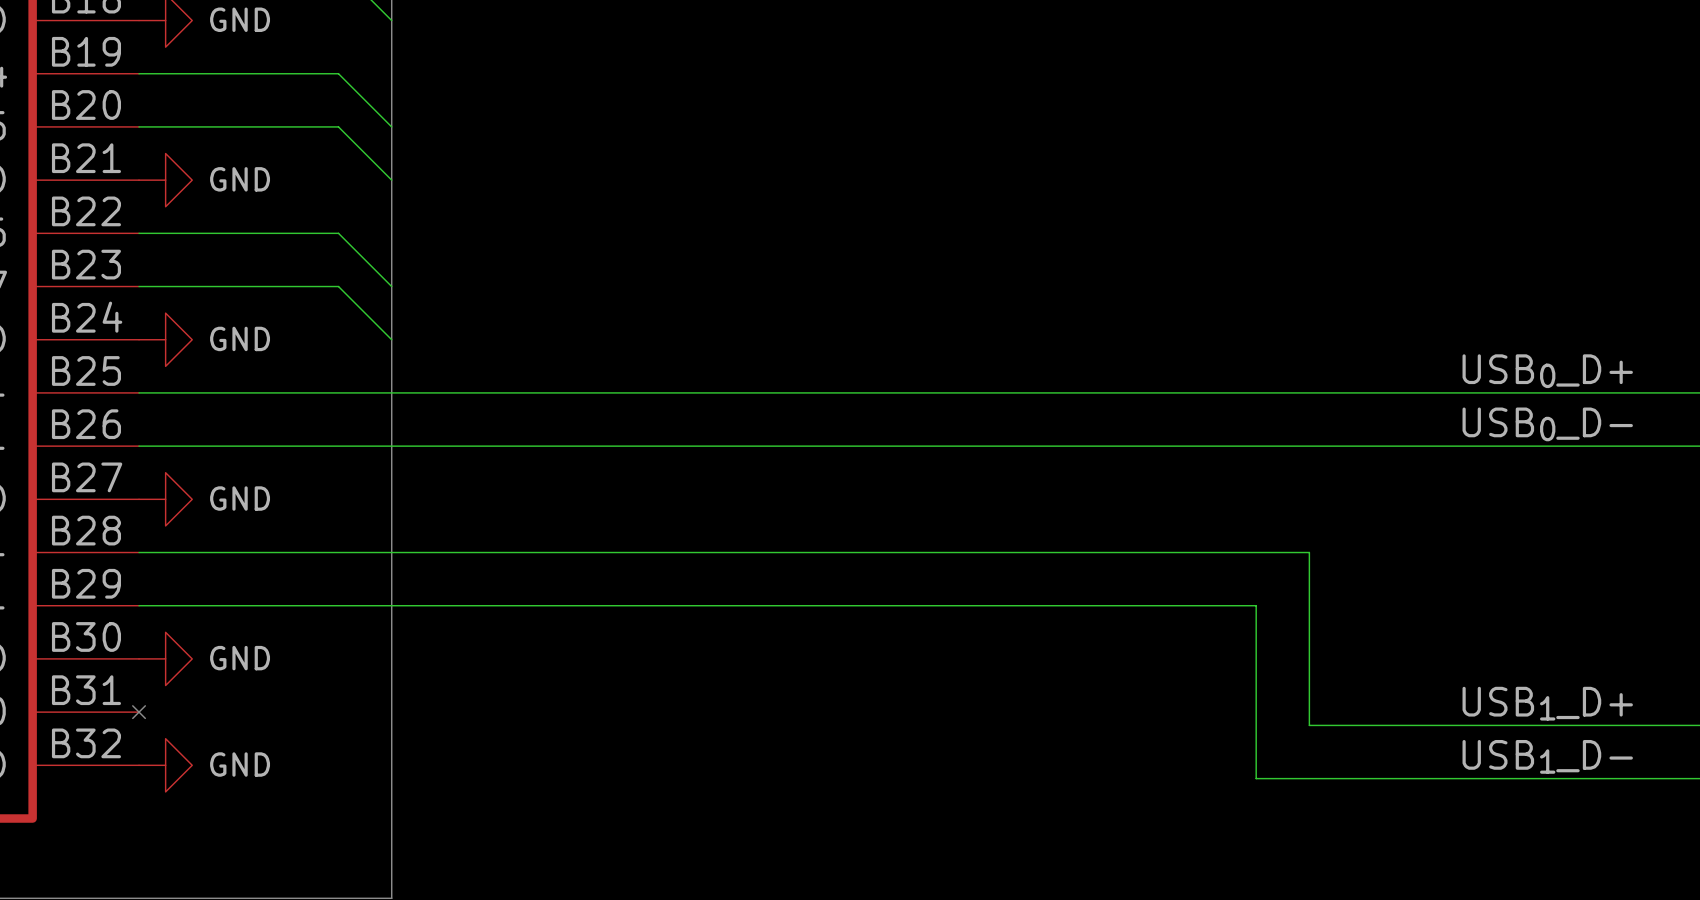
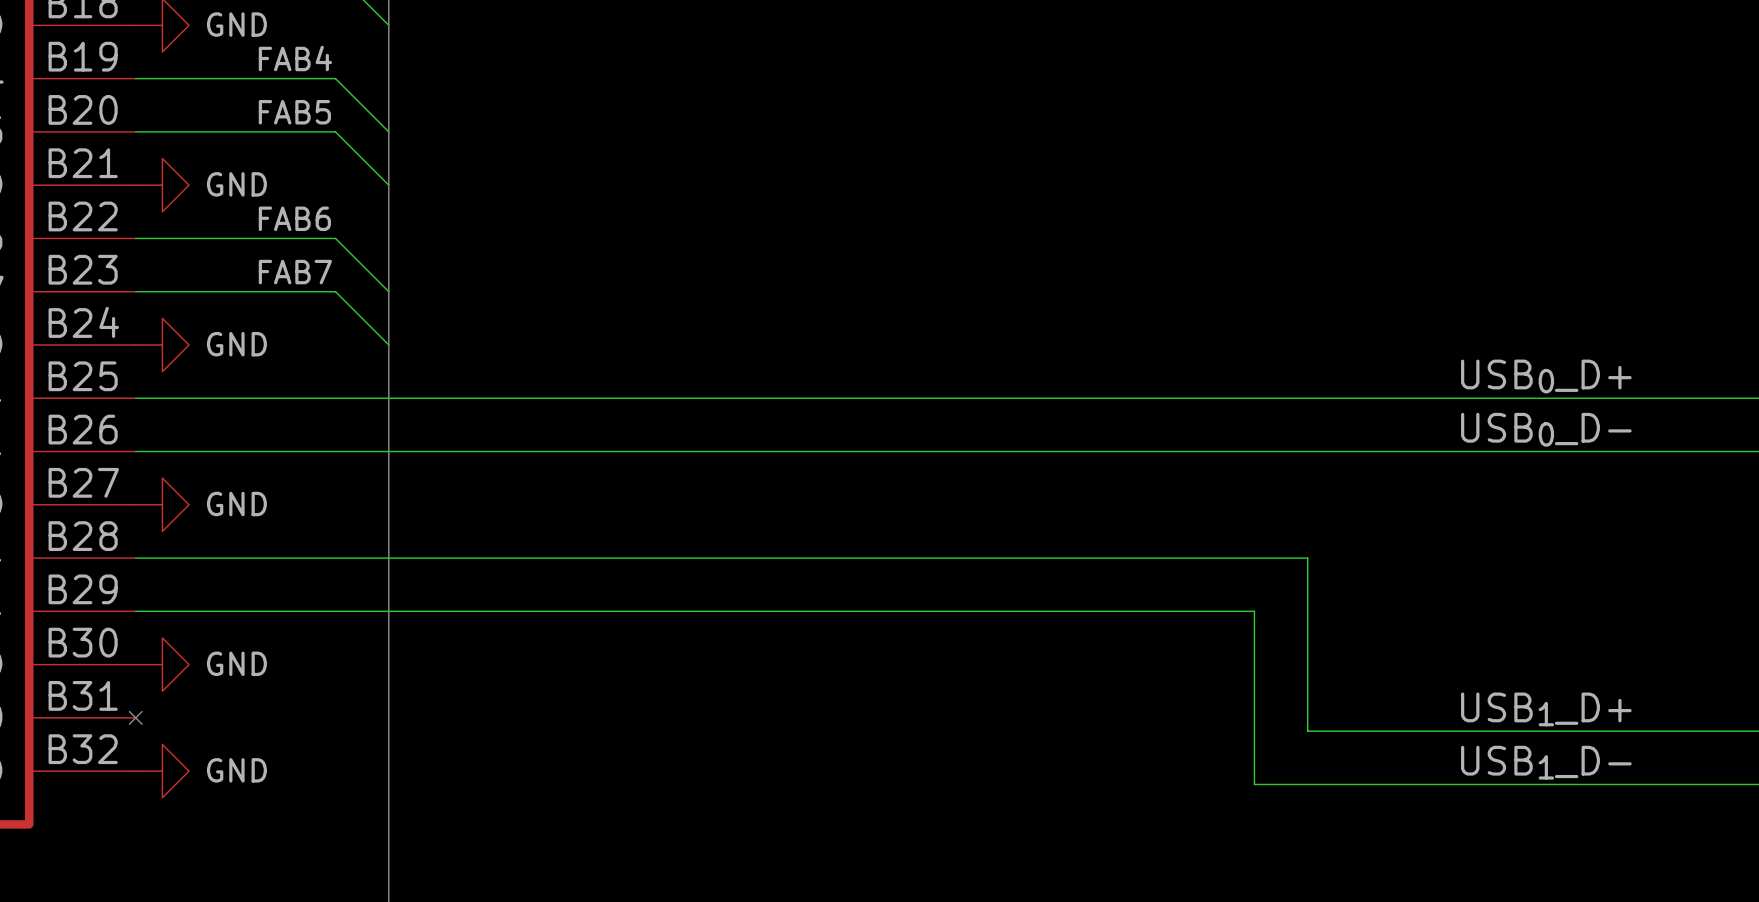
label: none -> FAB4 (295, 58)
label: none -> FAB5 (294, 112)
label: none -> FAB6 (294, 218)
label: none -> FAB7 (295, 272)

